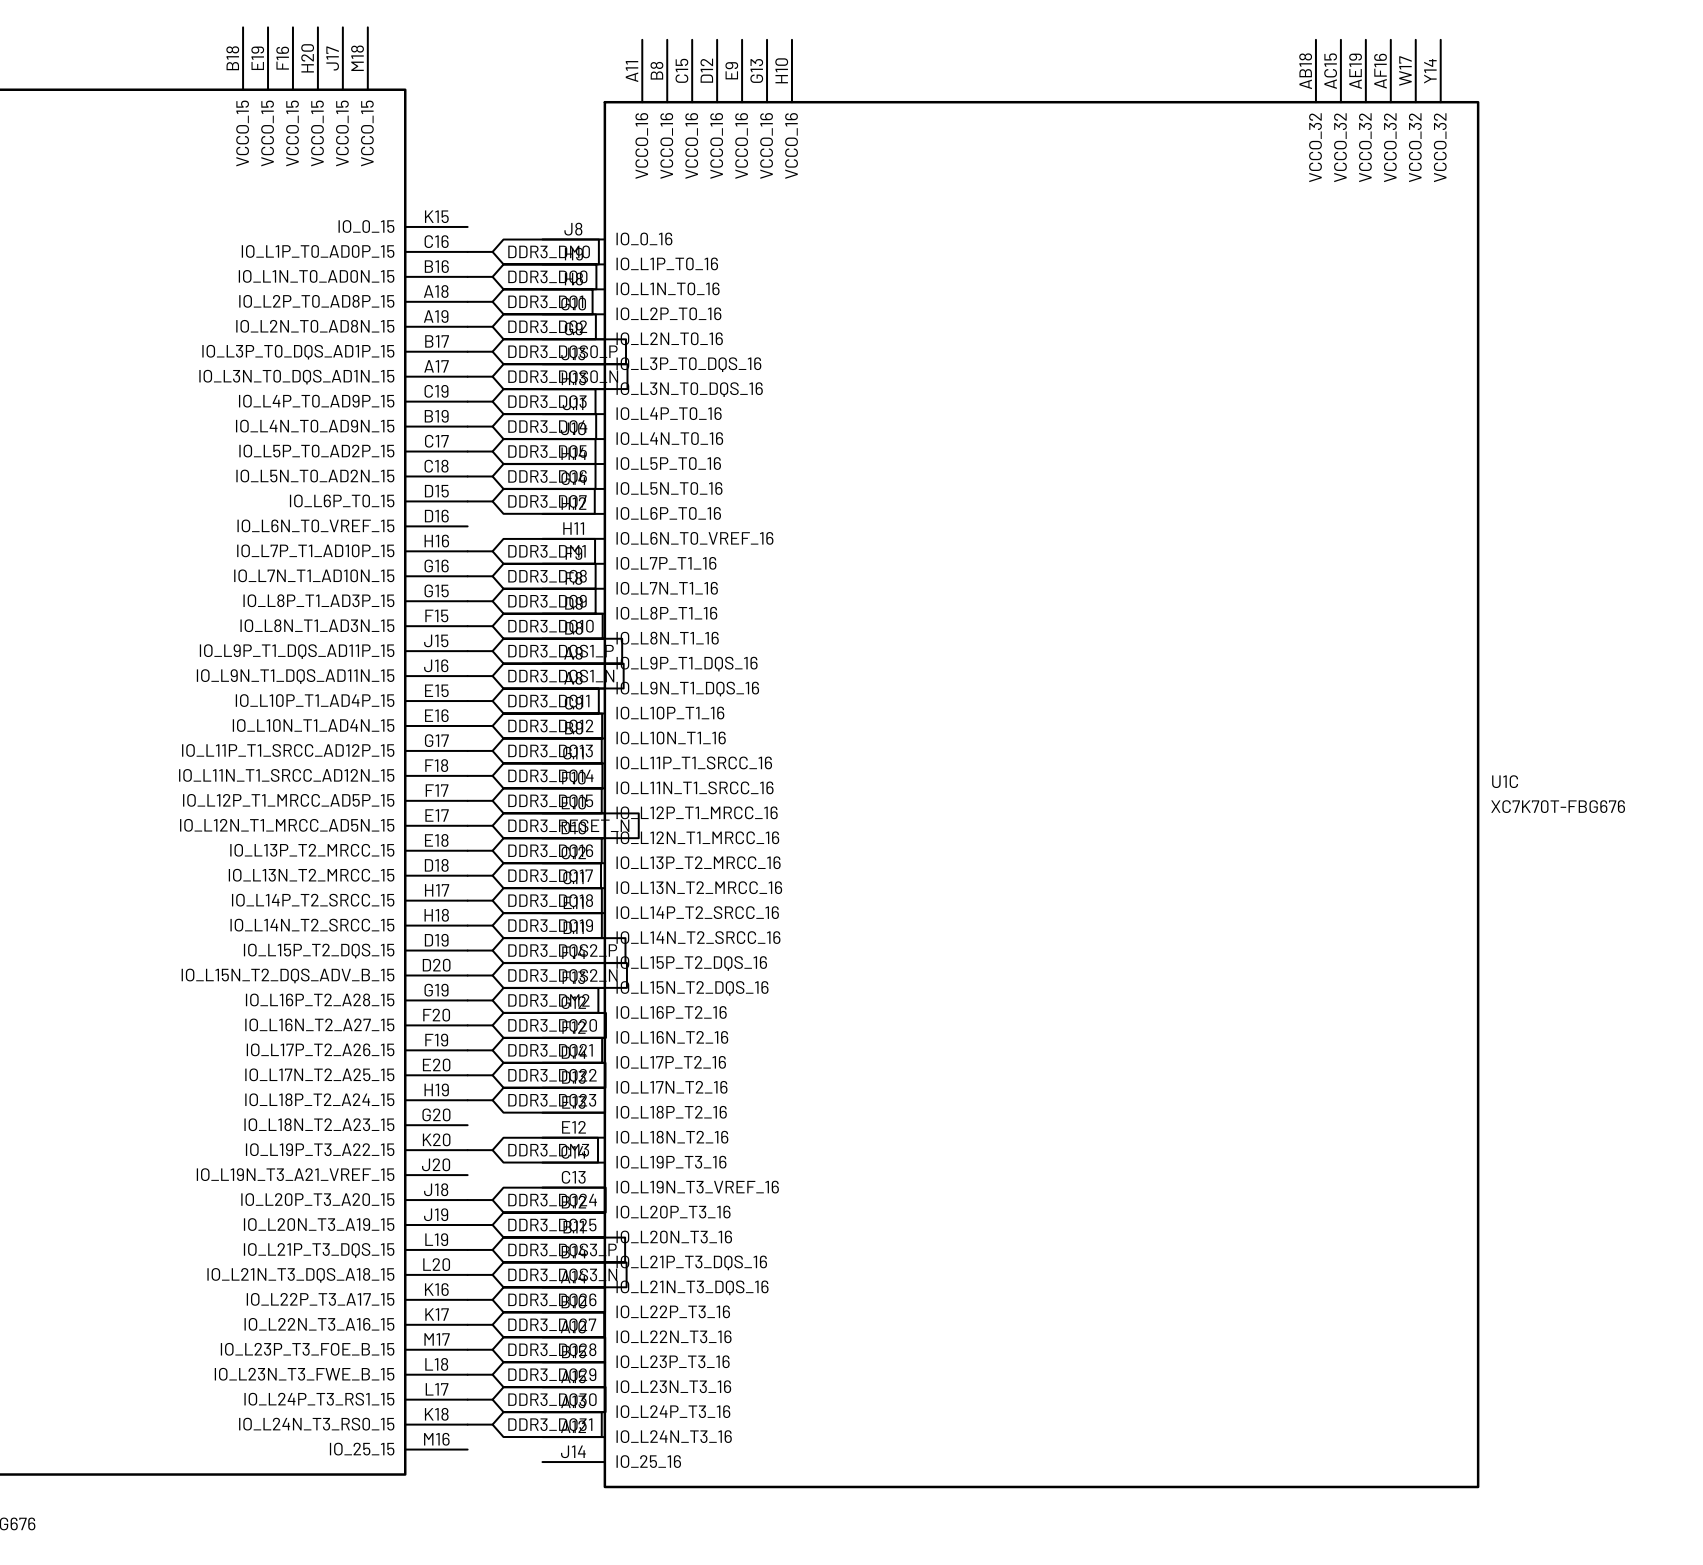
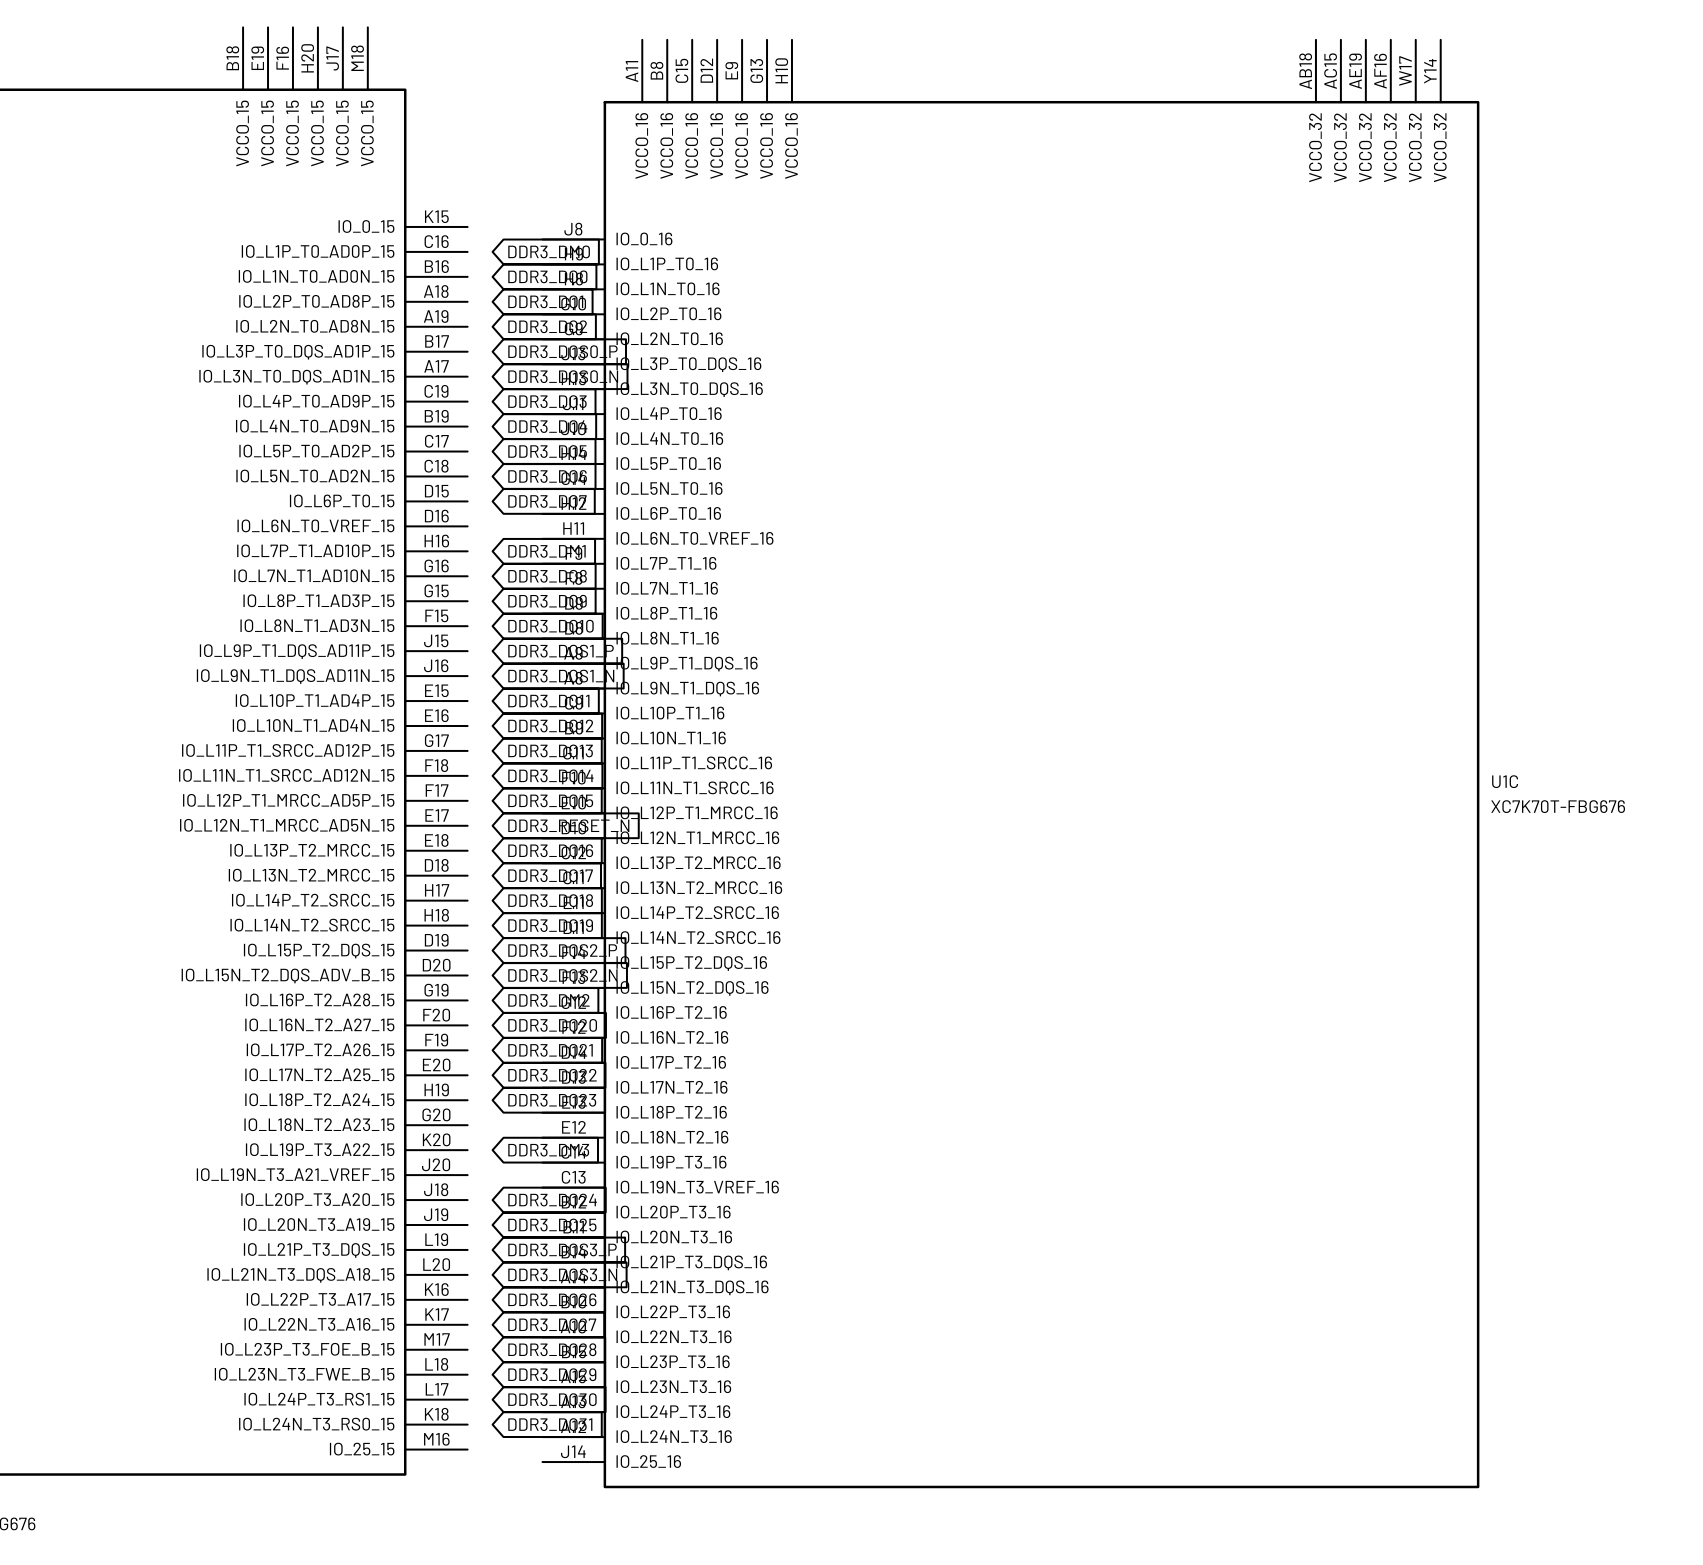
wire: (467, 251) (492, 251) -> none
wire: (467, 276) (492, 276) -> none
wire: (467, 301) (492, 301) -> none
wire: (467, 326) (492, 326) -> none
wire: (467, 351) (492, 351) -> none
wire: (467, 376) (492, 376) -> none
wire: (467, 401) (492, 401) -> none
wire: (467, 426) (492, 426) -> none
wire: (467, 451) (492, 451) -> none
wire: (467, 476) (492, 476) -> none
wire: (467, 501) (492, 501) -> none
wire: (467, 551) (492, 551) -> none
wire: (467, 576) (492, 576) -> none
wire: (467, 601) (492, 601) -> none
wire: (467, 626) (492, 626) -> none
wire: (467, 651) (492, 651) -> none
wire: (467, 676) (492, 676) -> none
wire: (467, 701) (492, 701) -> none
wire: (467, 725) (492, 725) -> none
wire: (467, 750) (492, 750) -> none
wire: (467, 775) (492, 775) -> none
wire: (467, 800) (492, 800) -> none
wire: (467, 825) (492, 825) -> none
wire: (467, 850) (492, 850) -> none
wire: (467, 875) (492, 875) -> none
wire: (467, 900) (492, 900) -> none
wire: (467, 925) (492, 925) -> none
wire: (467, 950) (492, 950) -> none
wire: (467, 975) (492, 975) -> none
wire: (467, 1000) (492, 1000) -> none
wire: (467, 1025) (492, 1025) -> none
wire: (467, 1050) (492, 1050) -> none
wire: (467, 1075) (492, 1075) -> none
wire: (467, 1100) (492, 1100) -> none
wire: (467, 1150) (492, 1150) -> none
wire: (467, 1200) (492, 1200) -> none
wire: (467, 1225) (492, 1225) -> none
wire: (467, 1249) (492, 1249) -> none
wire: (467, 1274) (492, 1274) -> none
wire: (467, 1299) (492, 1299) -> none
wire: (467, 1324) (492, 1324) -> none
wire: (467, 1349) (492, 1349) -> none
wire: (467, 1374) (492, 1374) -> none
wire: (467, 1399) (492, 1399) -> none
wire: (467, 1424) (492, 1424) -> none

